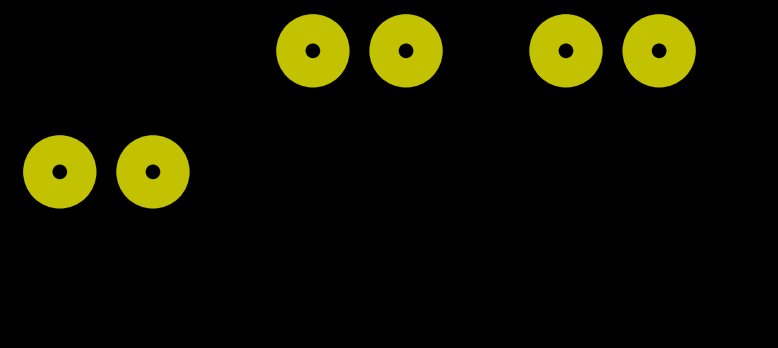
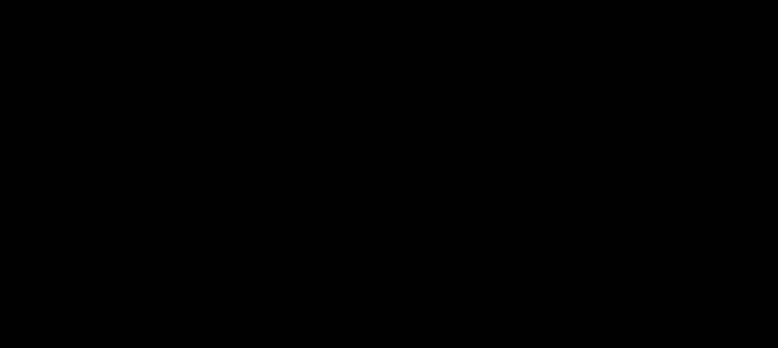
part: (359, 50) -> none
part: (612, 50) -> none
part: (106, 171) -> none

